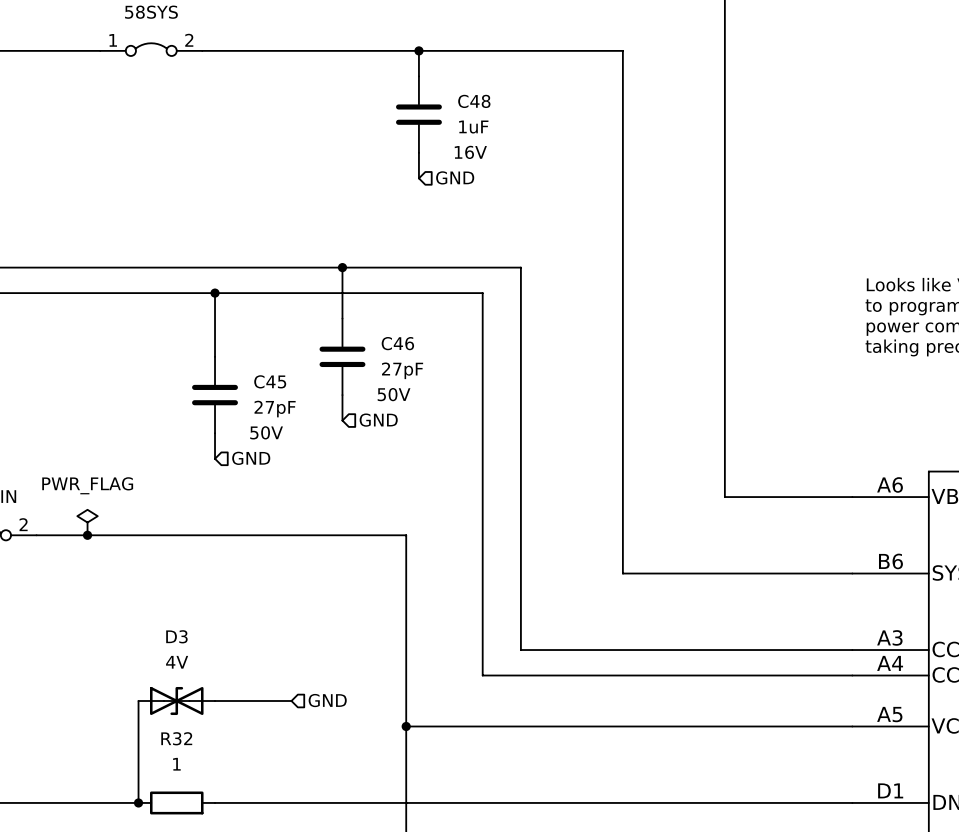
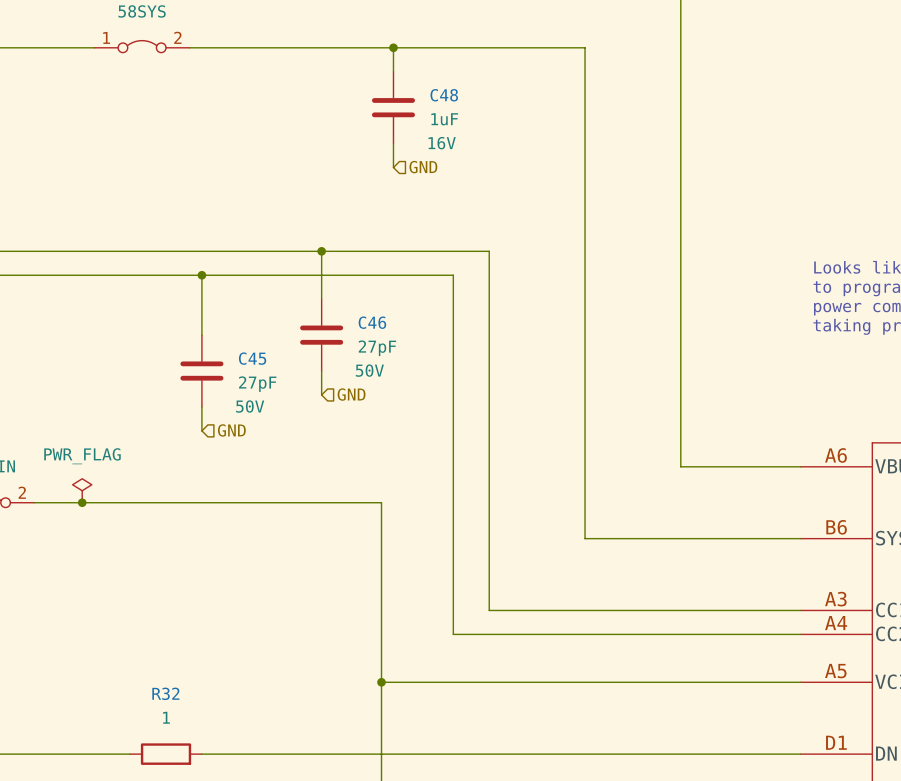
hierarchical label: GND (327, 700) -> none
wire: (138, 701) (138, 802) -> none
D3: 4V (176, 701) -> none
wire: (215, 701) (291, 701) -> none
junction: (138, 802) -> none

